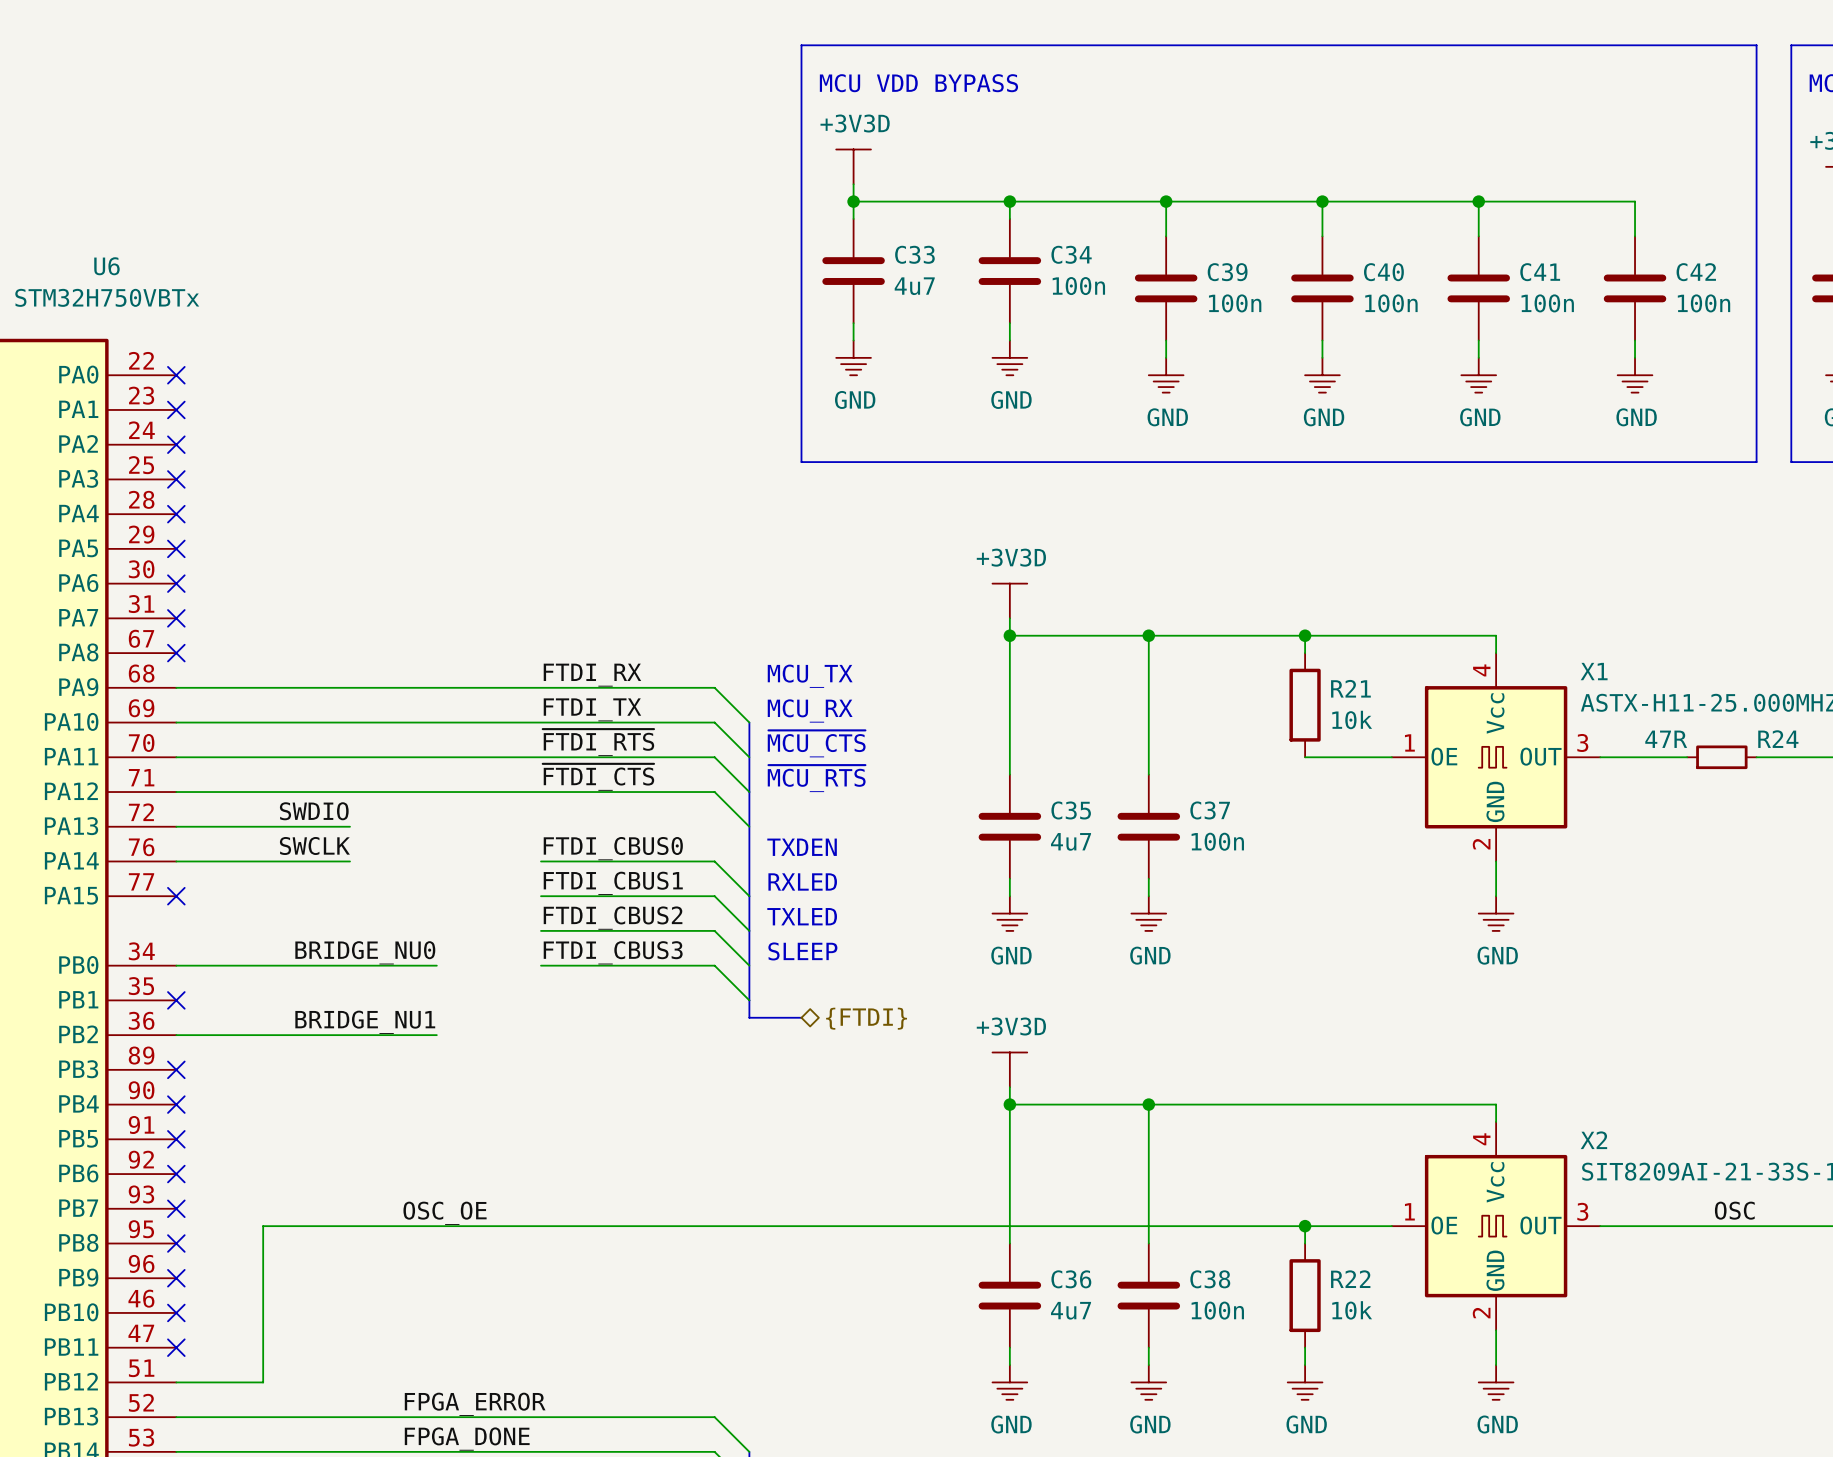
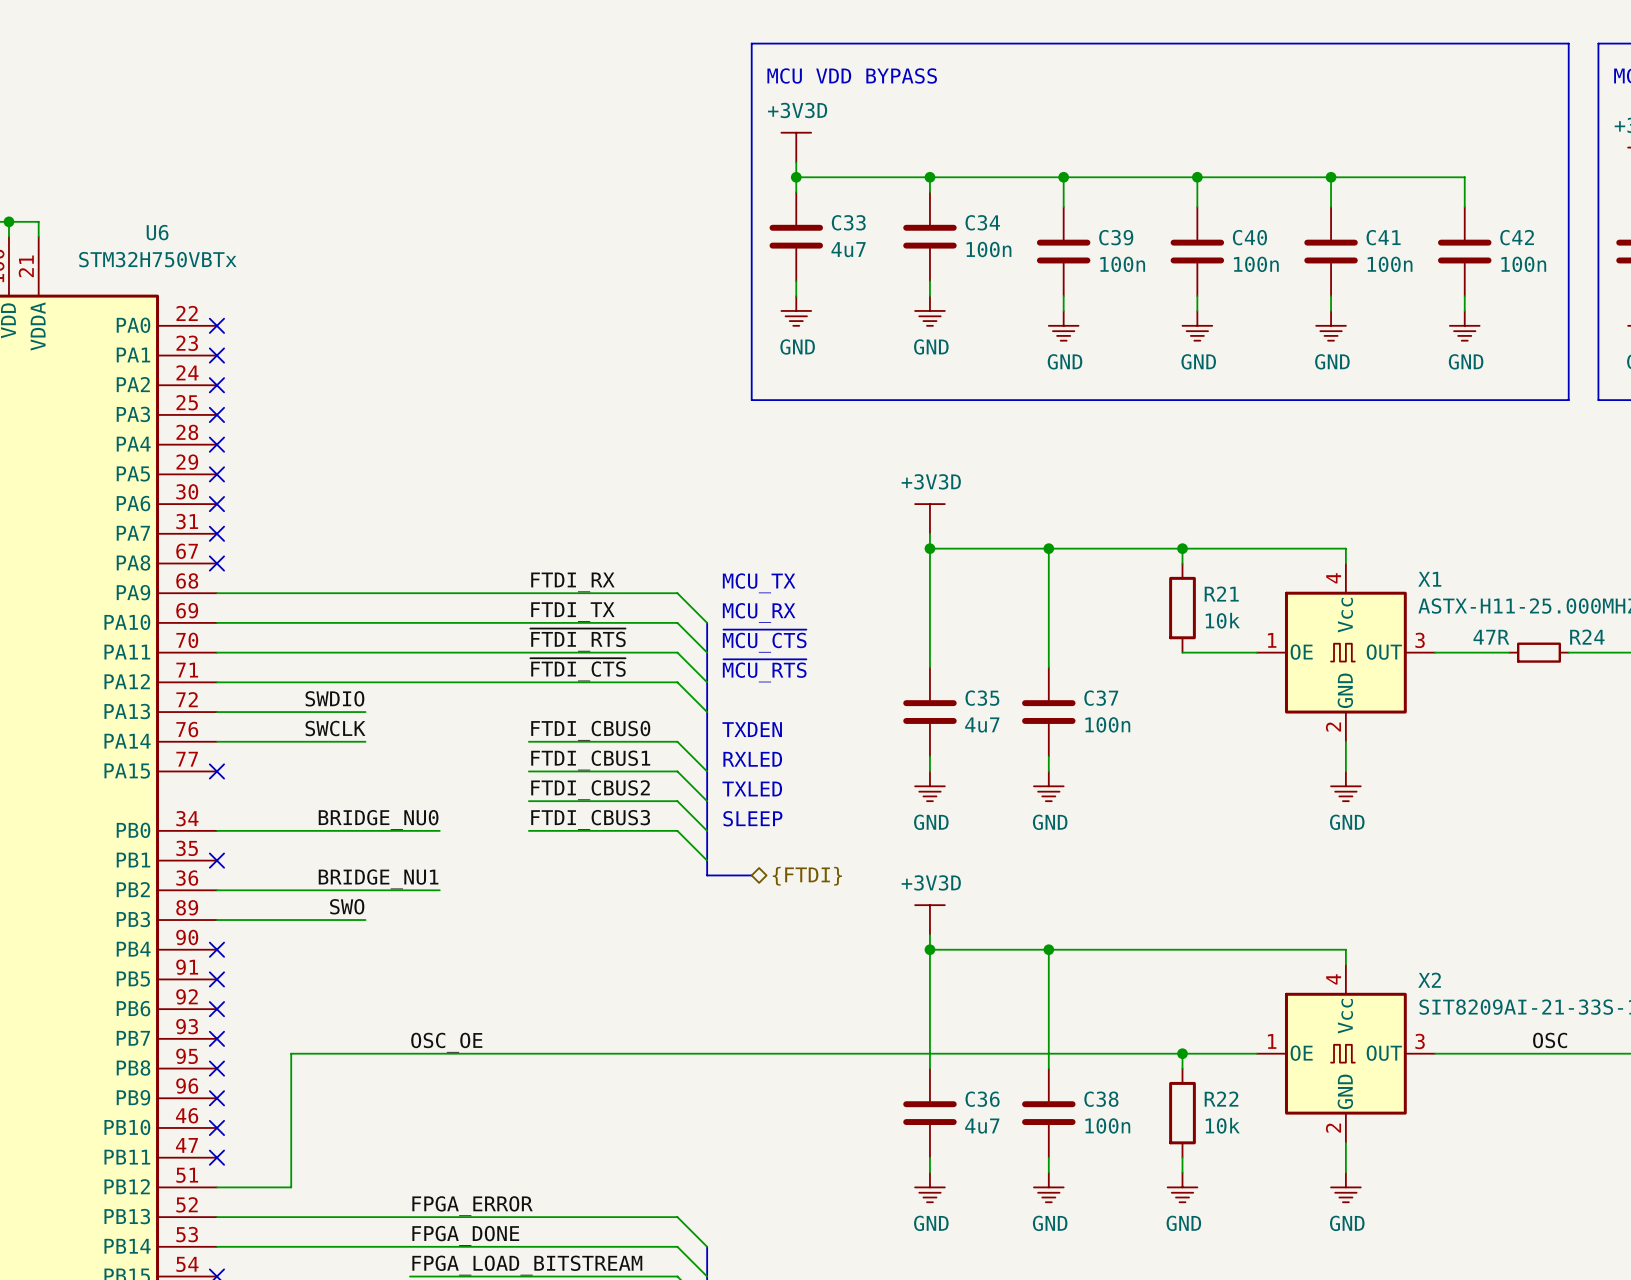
label: none -> SWO (347, 906)
wire: none -> (216, 920) (365, 920)
no-connect mark: (176, 1069) -> none

